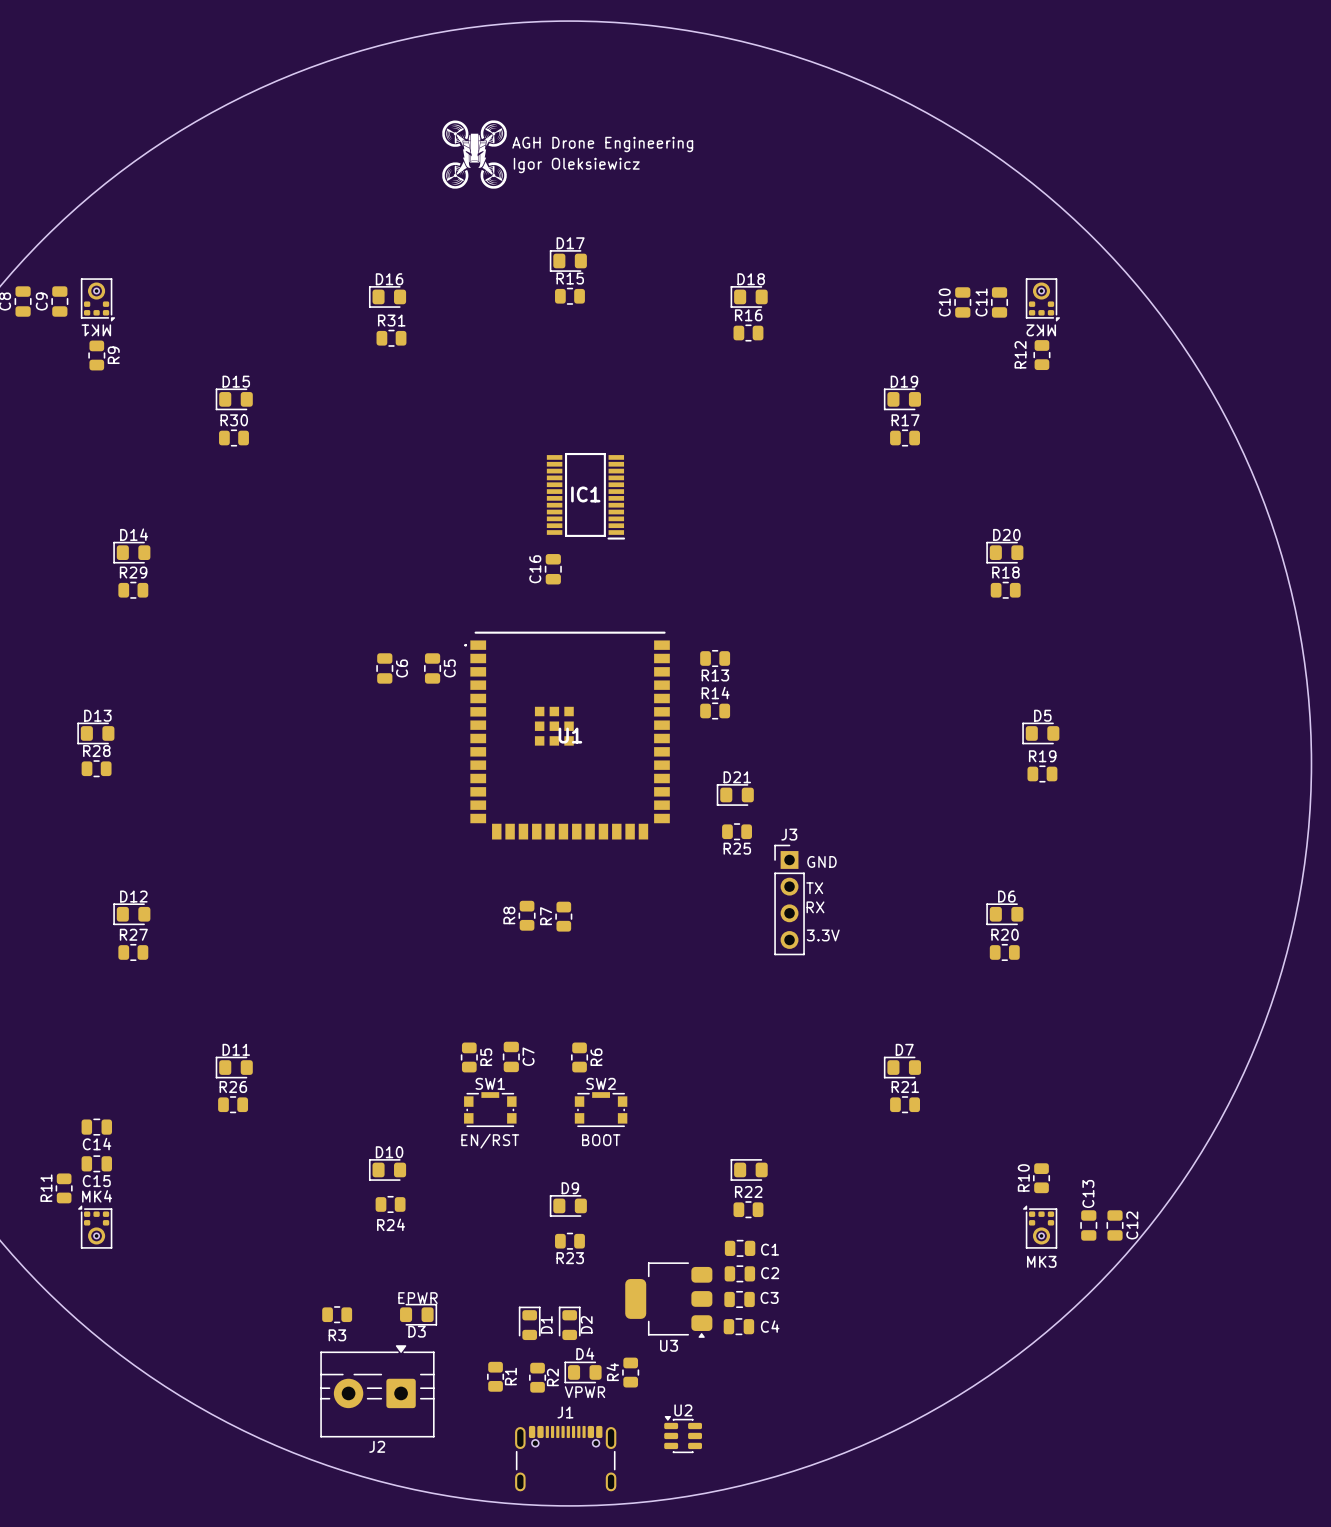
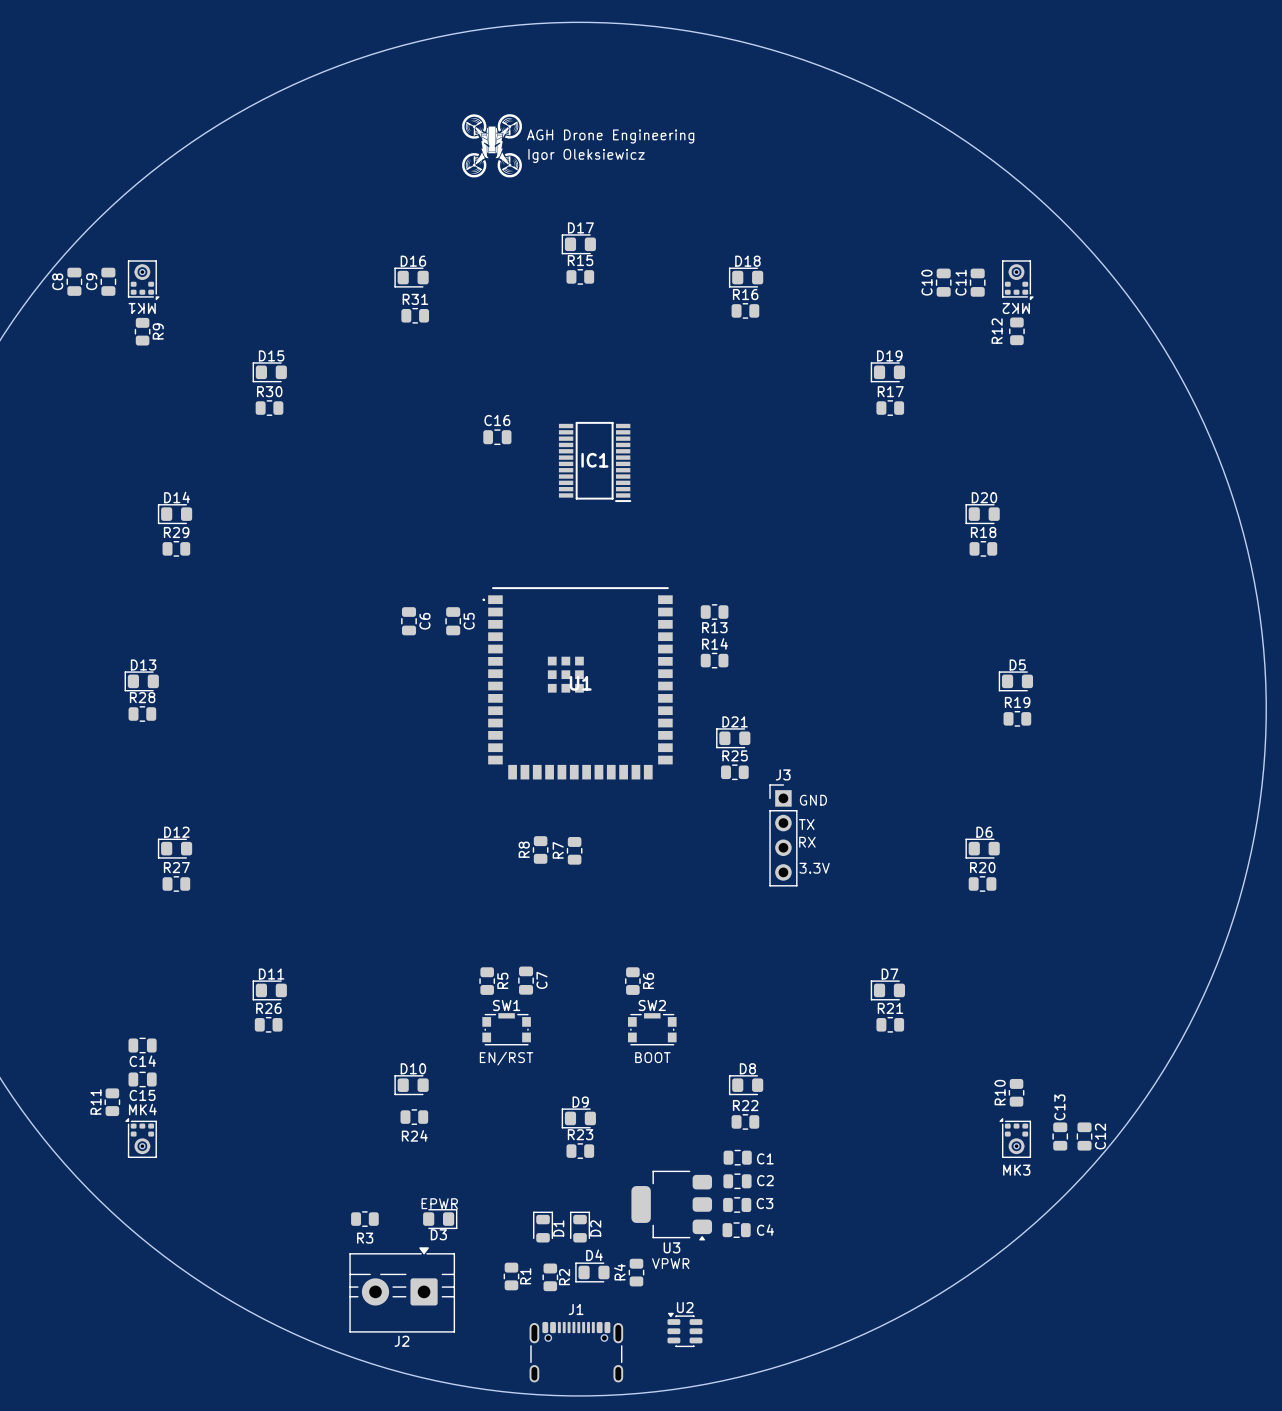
C16 rotation: 0° (553, 569) -> 90° clockwise (497, 437)
C16 position: (553, 569) -> (497, 437)
R25 name position: R25 (737, 848) -> R25 (735, 755)
R6 position: (579, 1057) -> (632, 981)
SW2 position: (601, 1109) -> (652, 1029)
text position: BOOT (601, 1140) -> BOOT (652, 1057)
D8 name: none -> D8 (747, 1068)
R23 name position: R23 (570, 1258) -> R23 (580, 1134)
text position: VPWR (584, 1392) -> VPWR (670, 1263)

